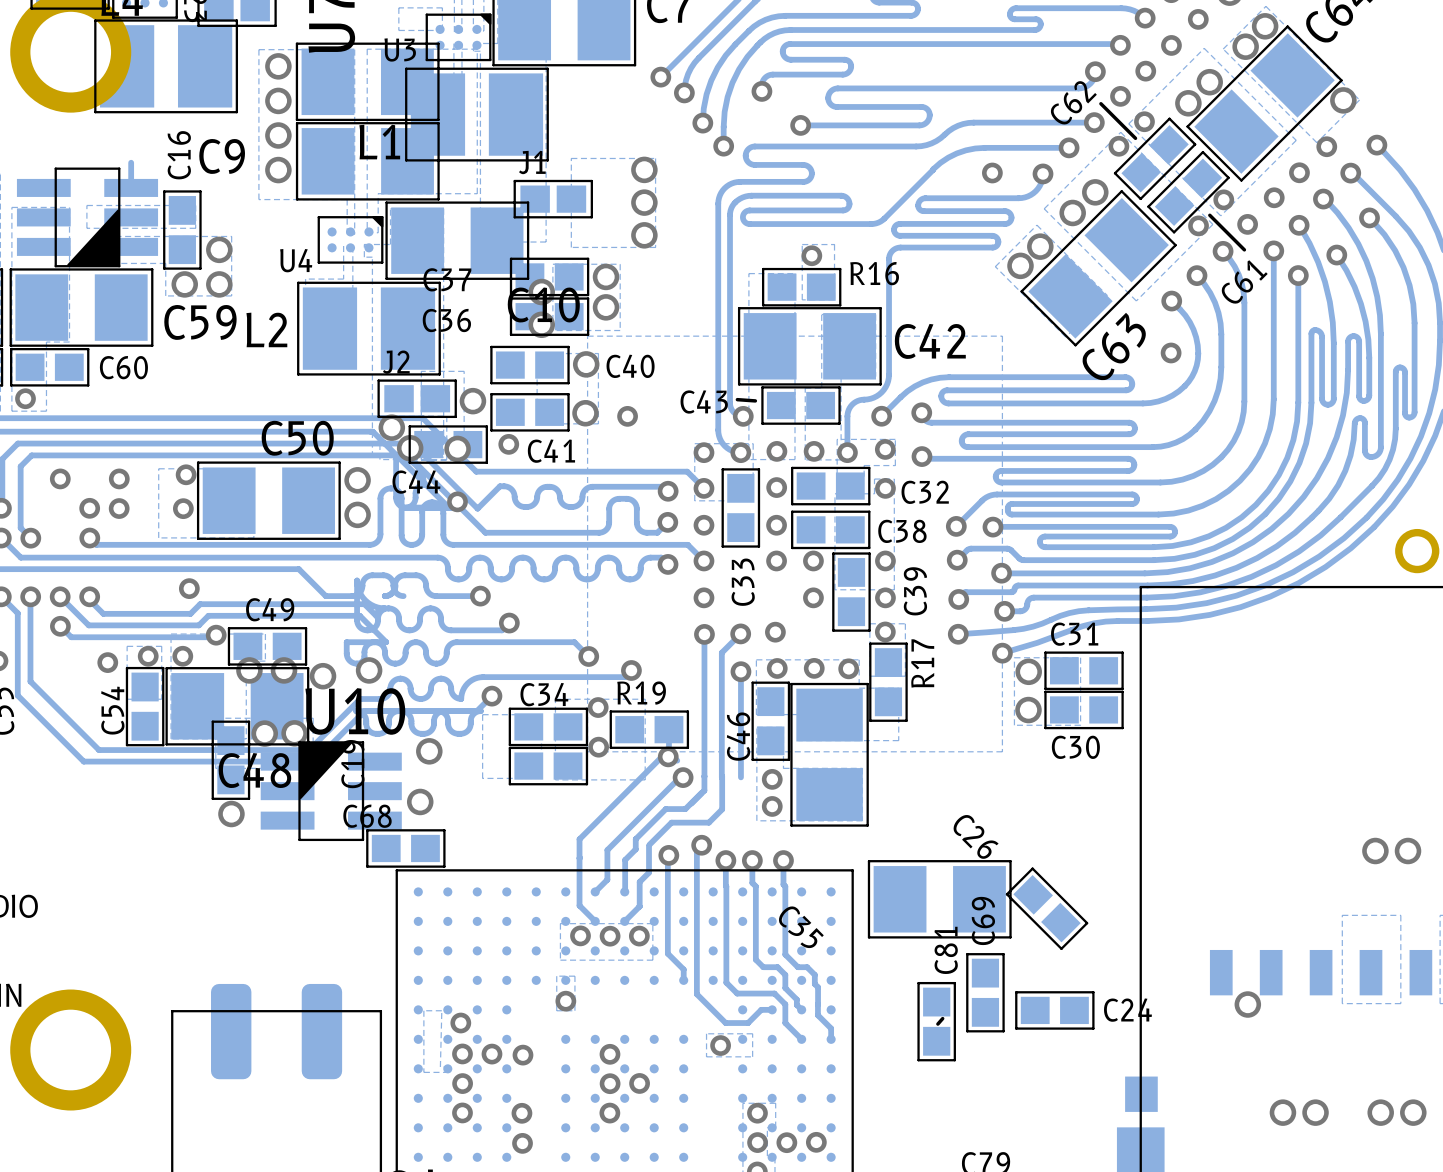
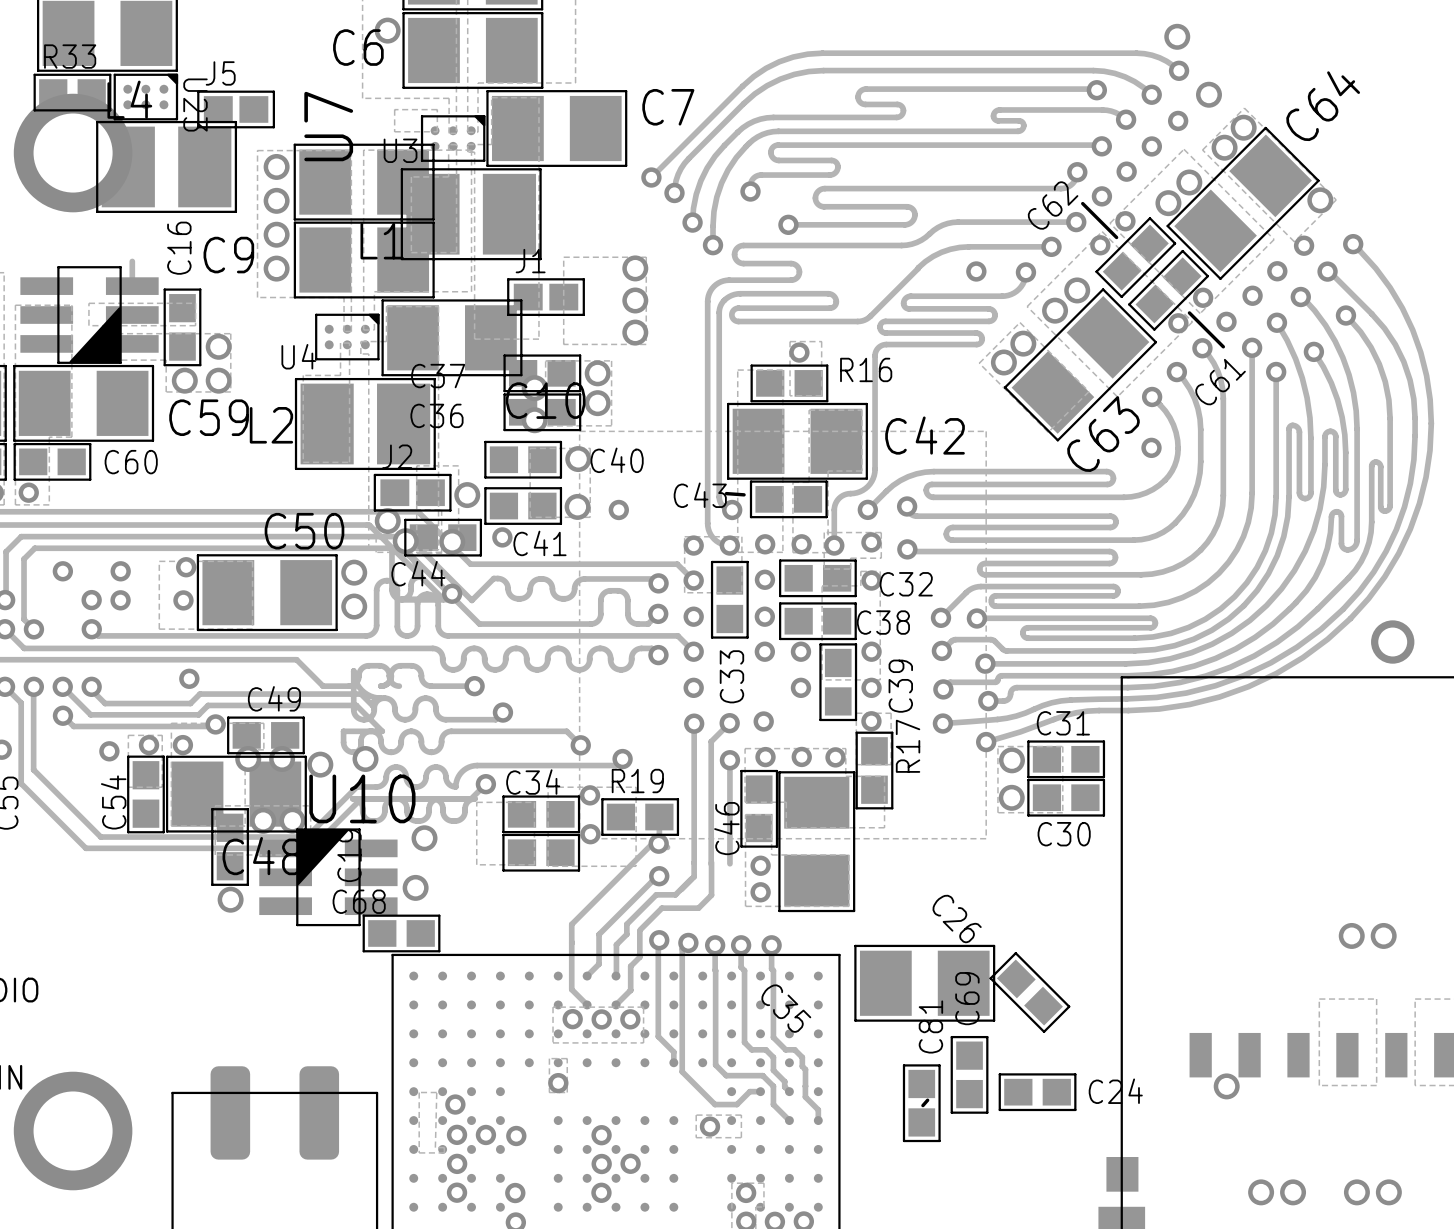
track: (686, 773) (679, 780) (676, 780) (607, 850) -> (659, 876) (599, 934)
via position: (683, 777) -> (659, 876)
track: (701, 845) (696, 850) (696, 994) -> (688, 942) (682, 949) (682, 1071) (686, 1076)
via position: (701, 845) -> (688, 942)

